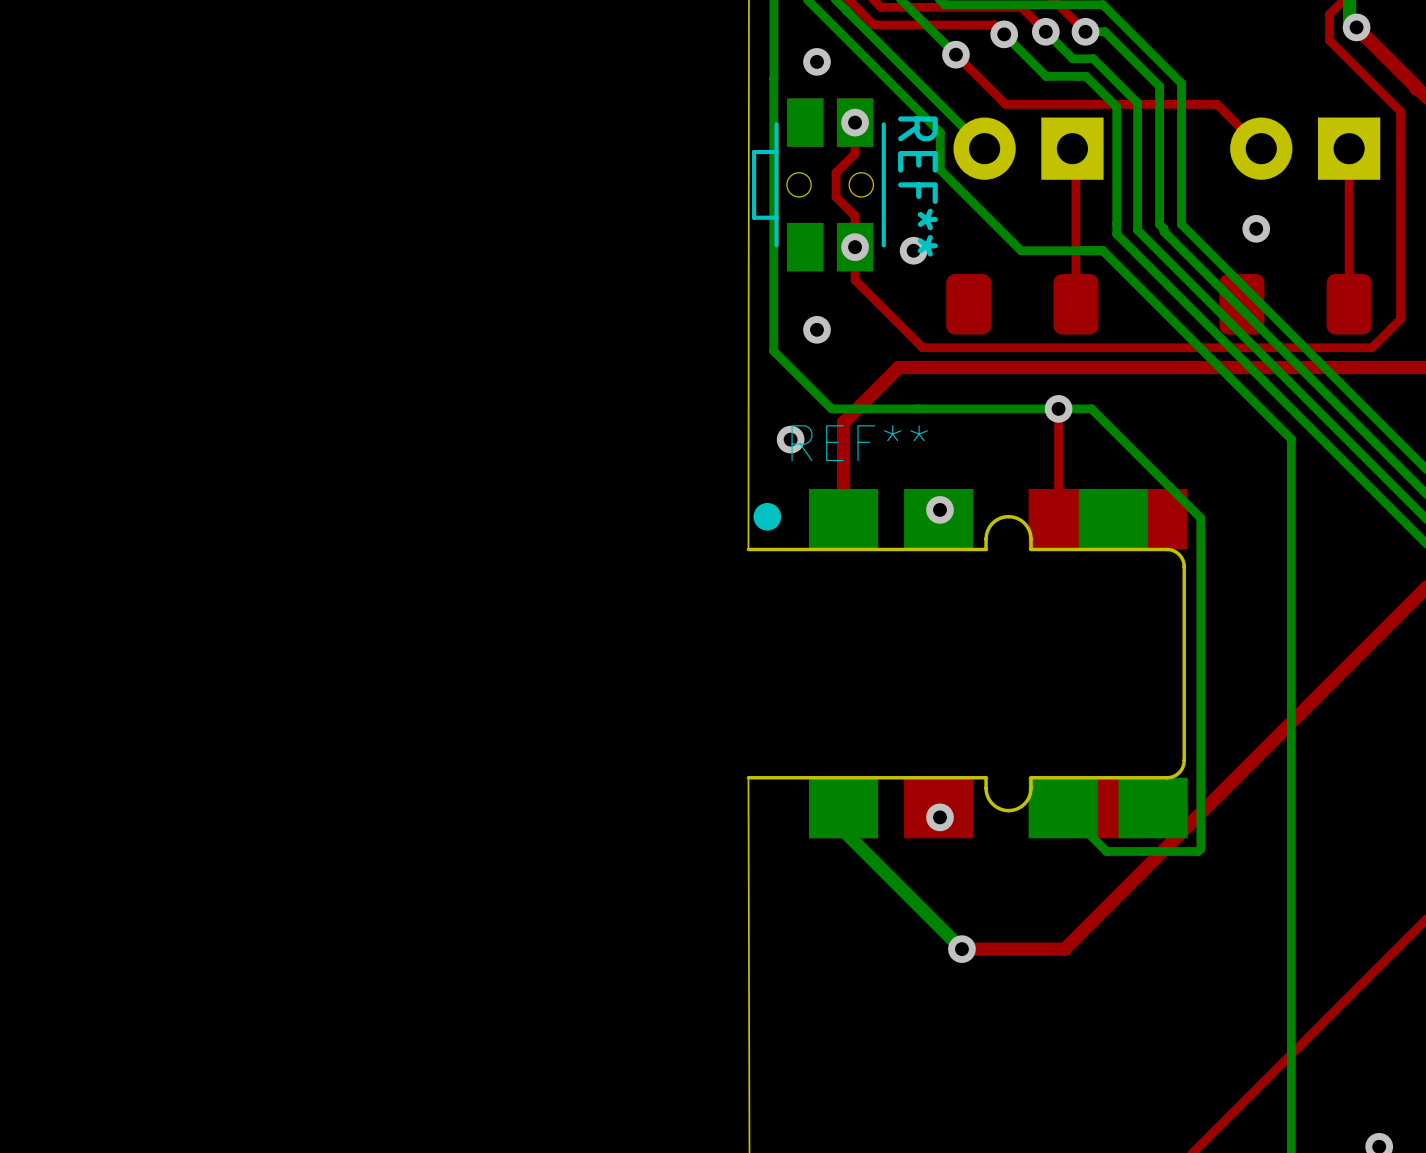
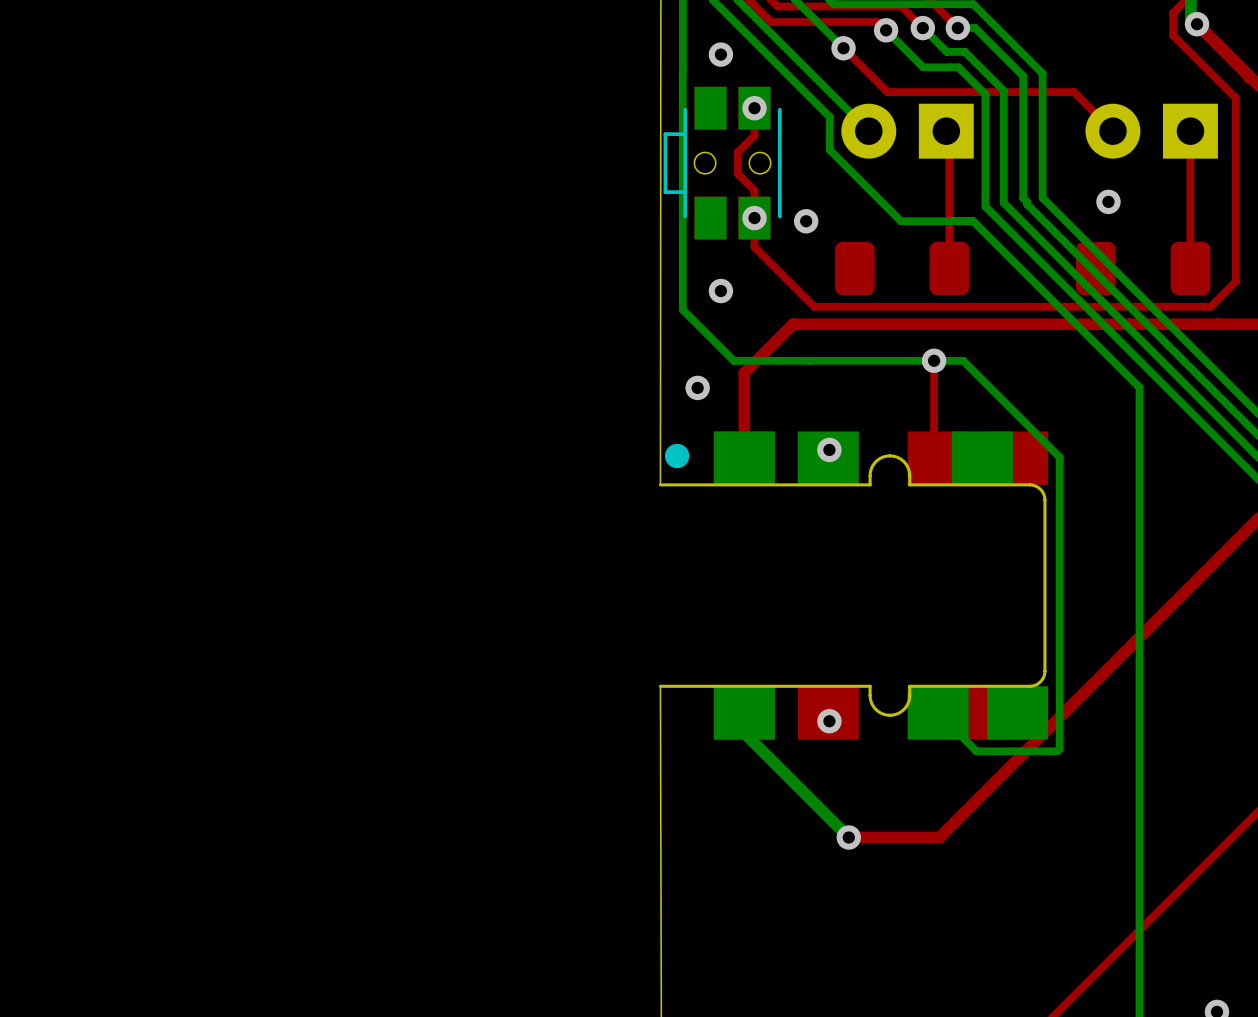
part text: REF** (917, 186) -> none
part text: REF** (859, 443) -> none

